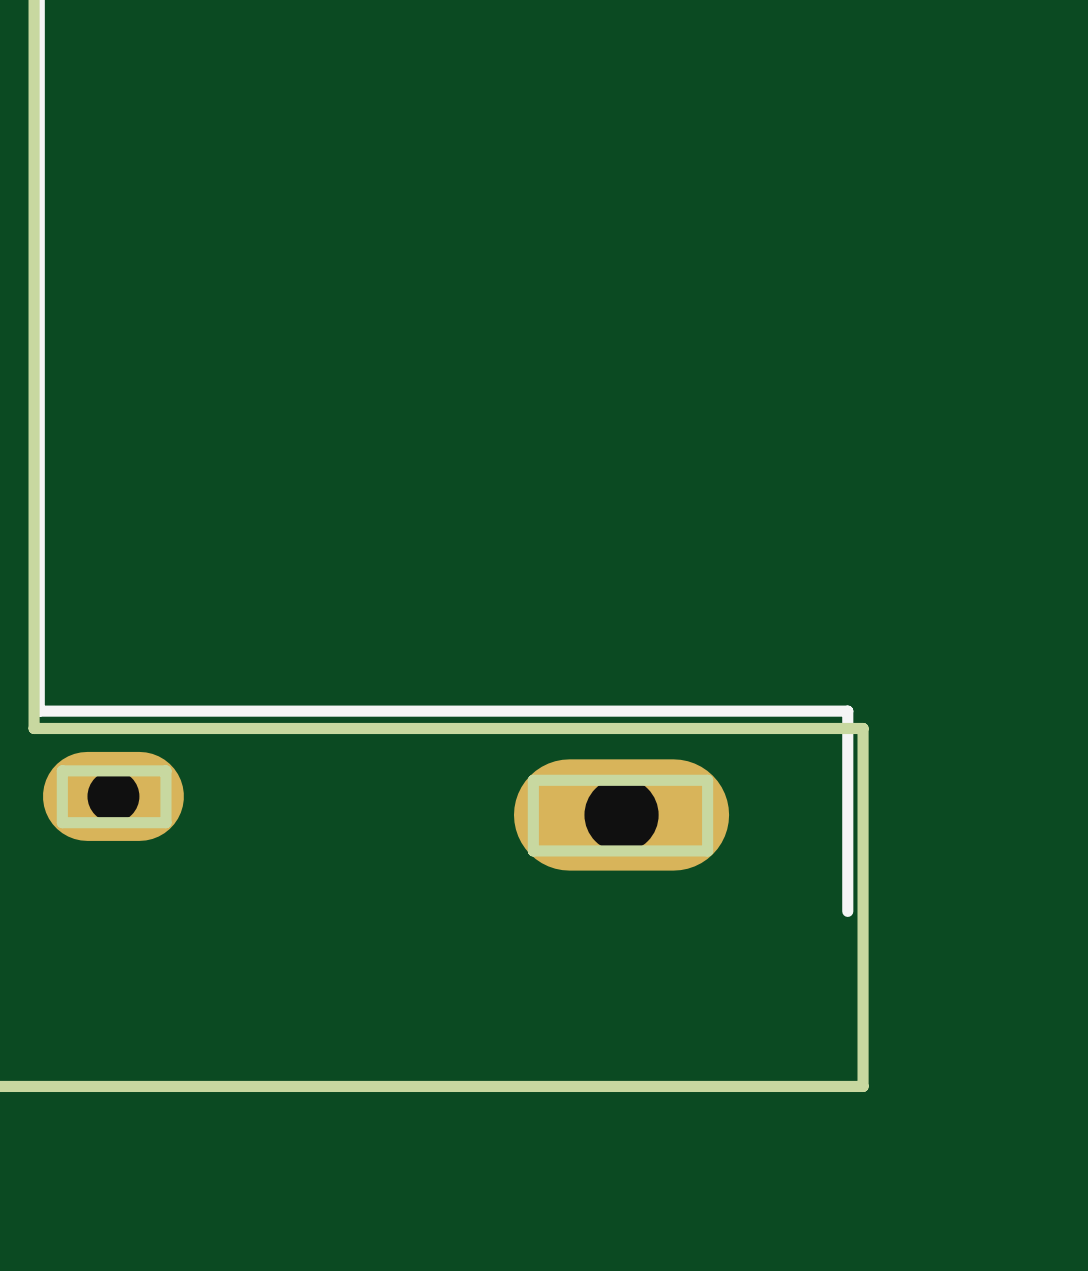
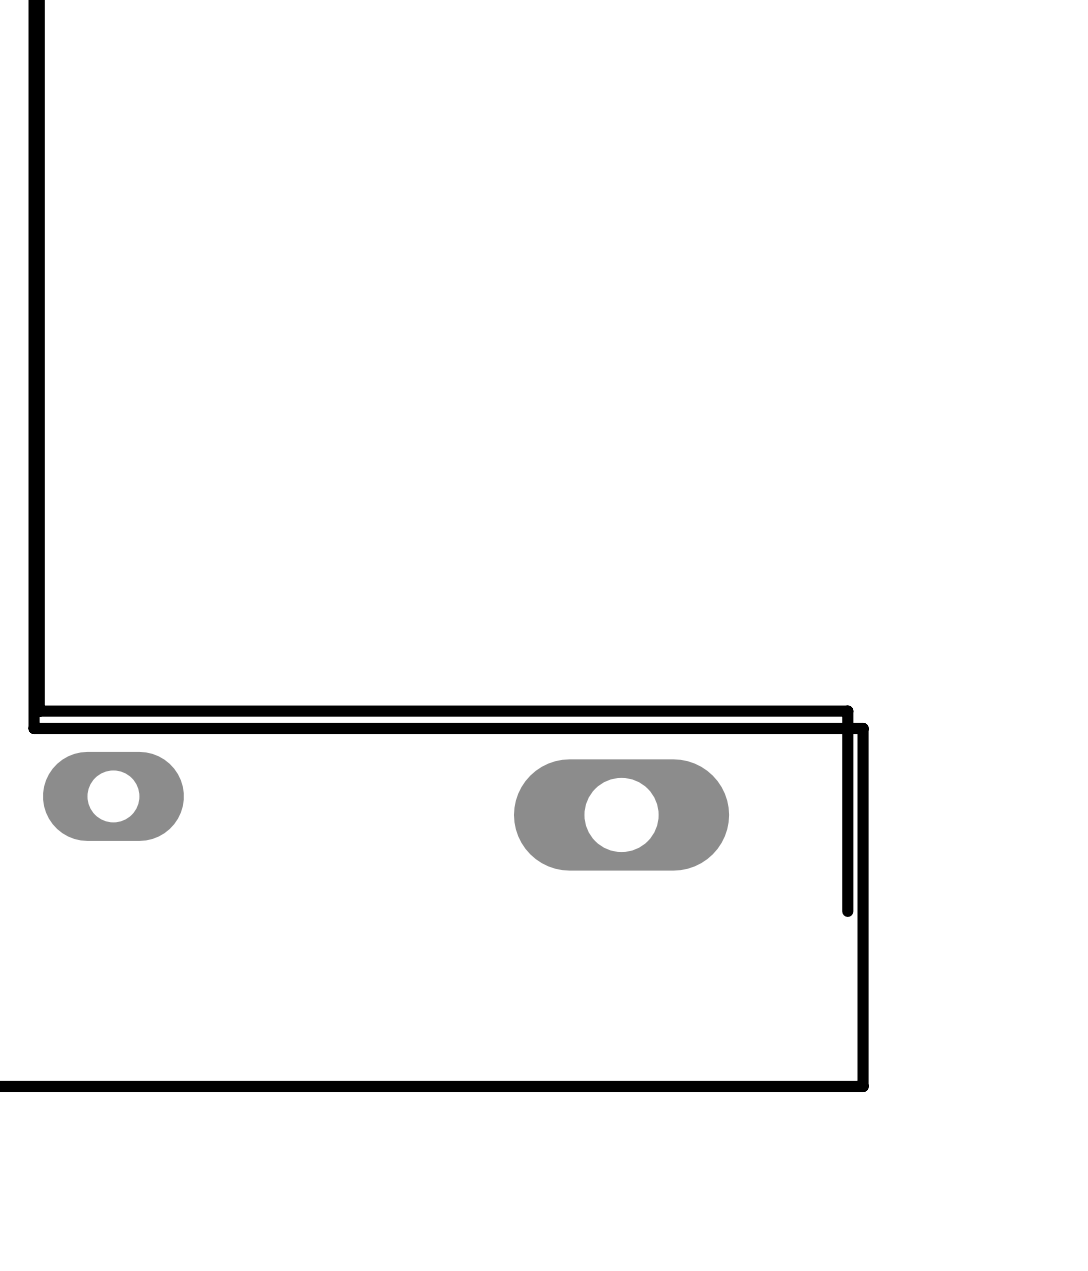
board edge: (62, 770) (62, 822) (165, 822) (165, 770) (62, 770) -> none
board edge: (533, 780) (533, 850) (707, 850) (707, 780) (533, 780) -> none

